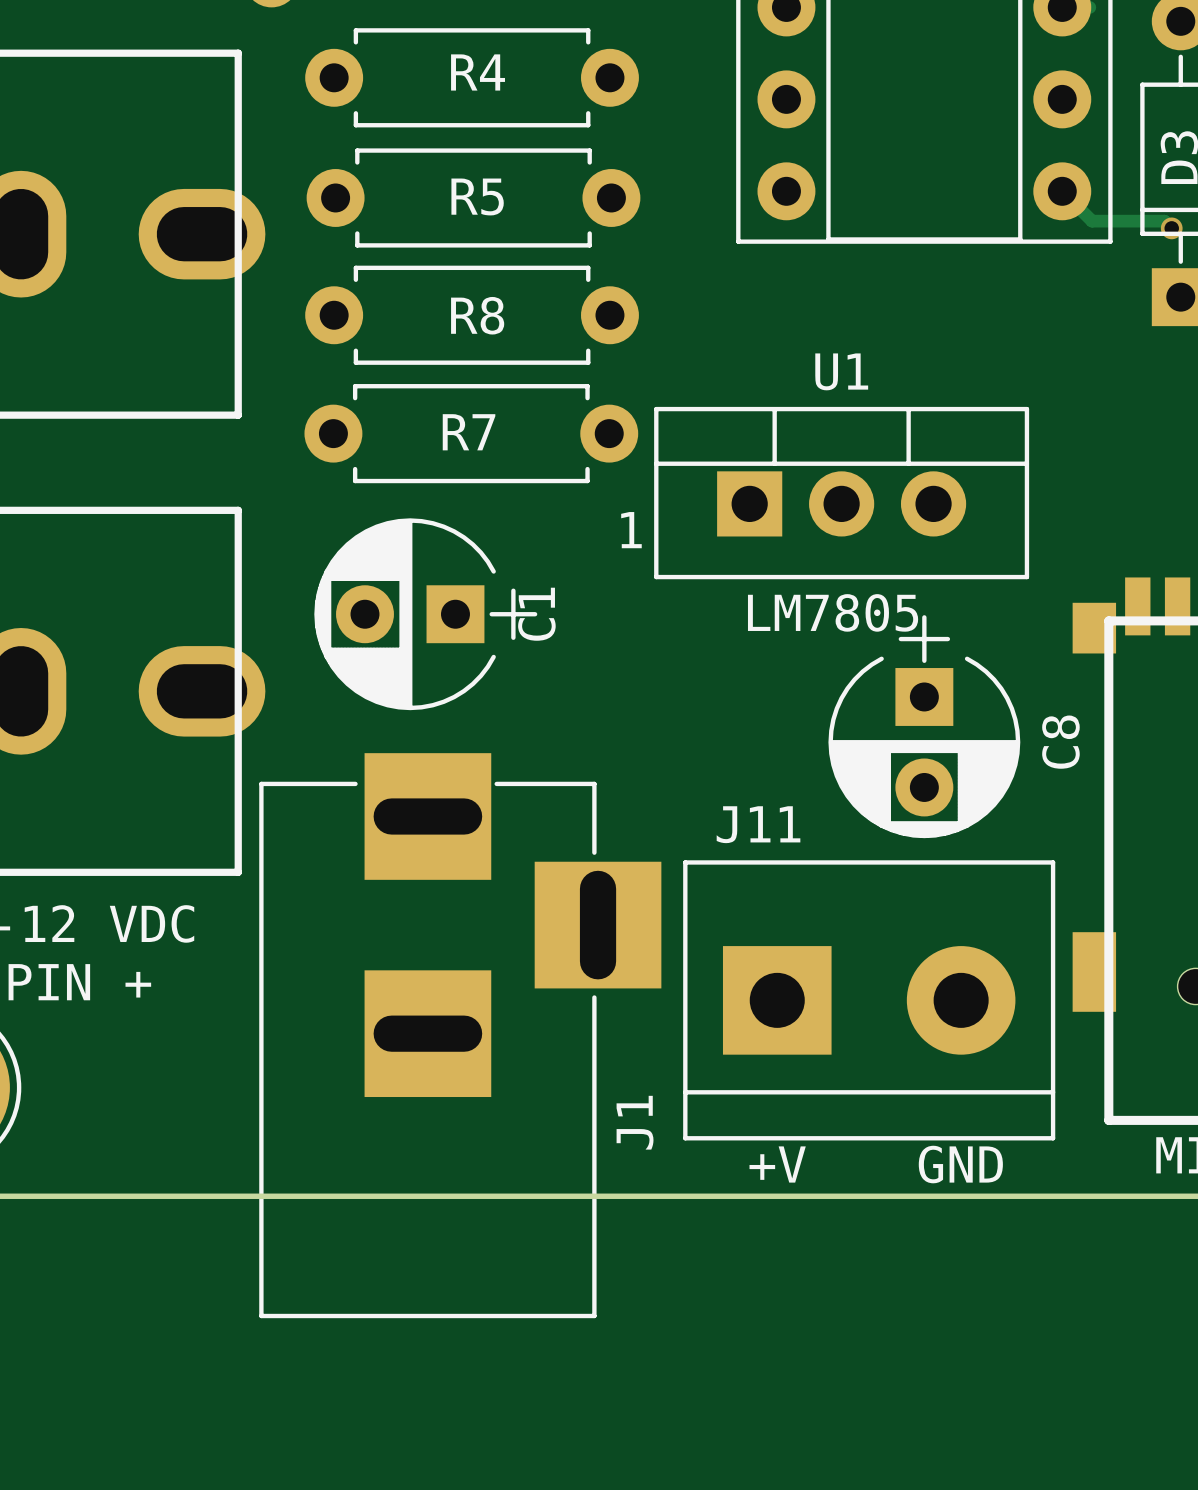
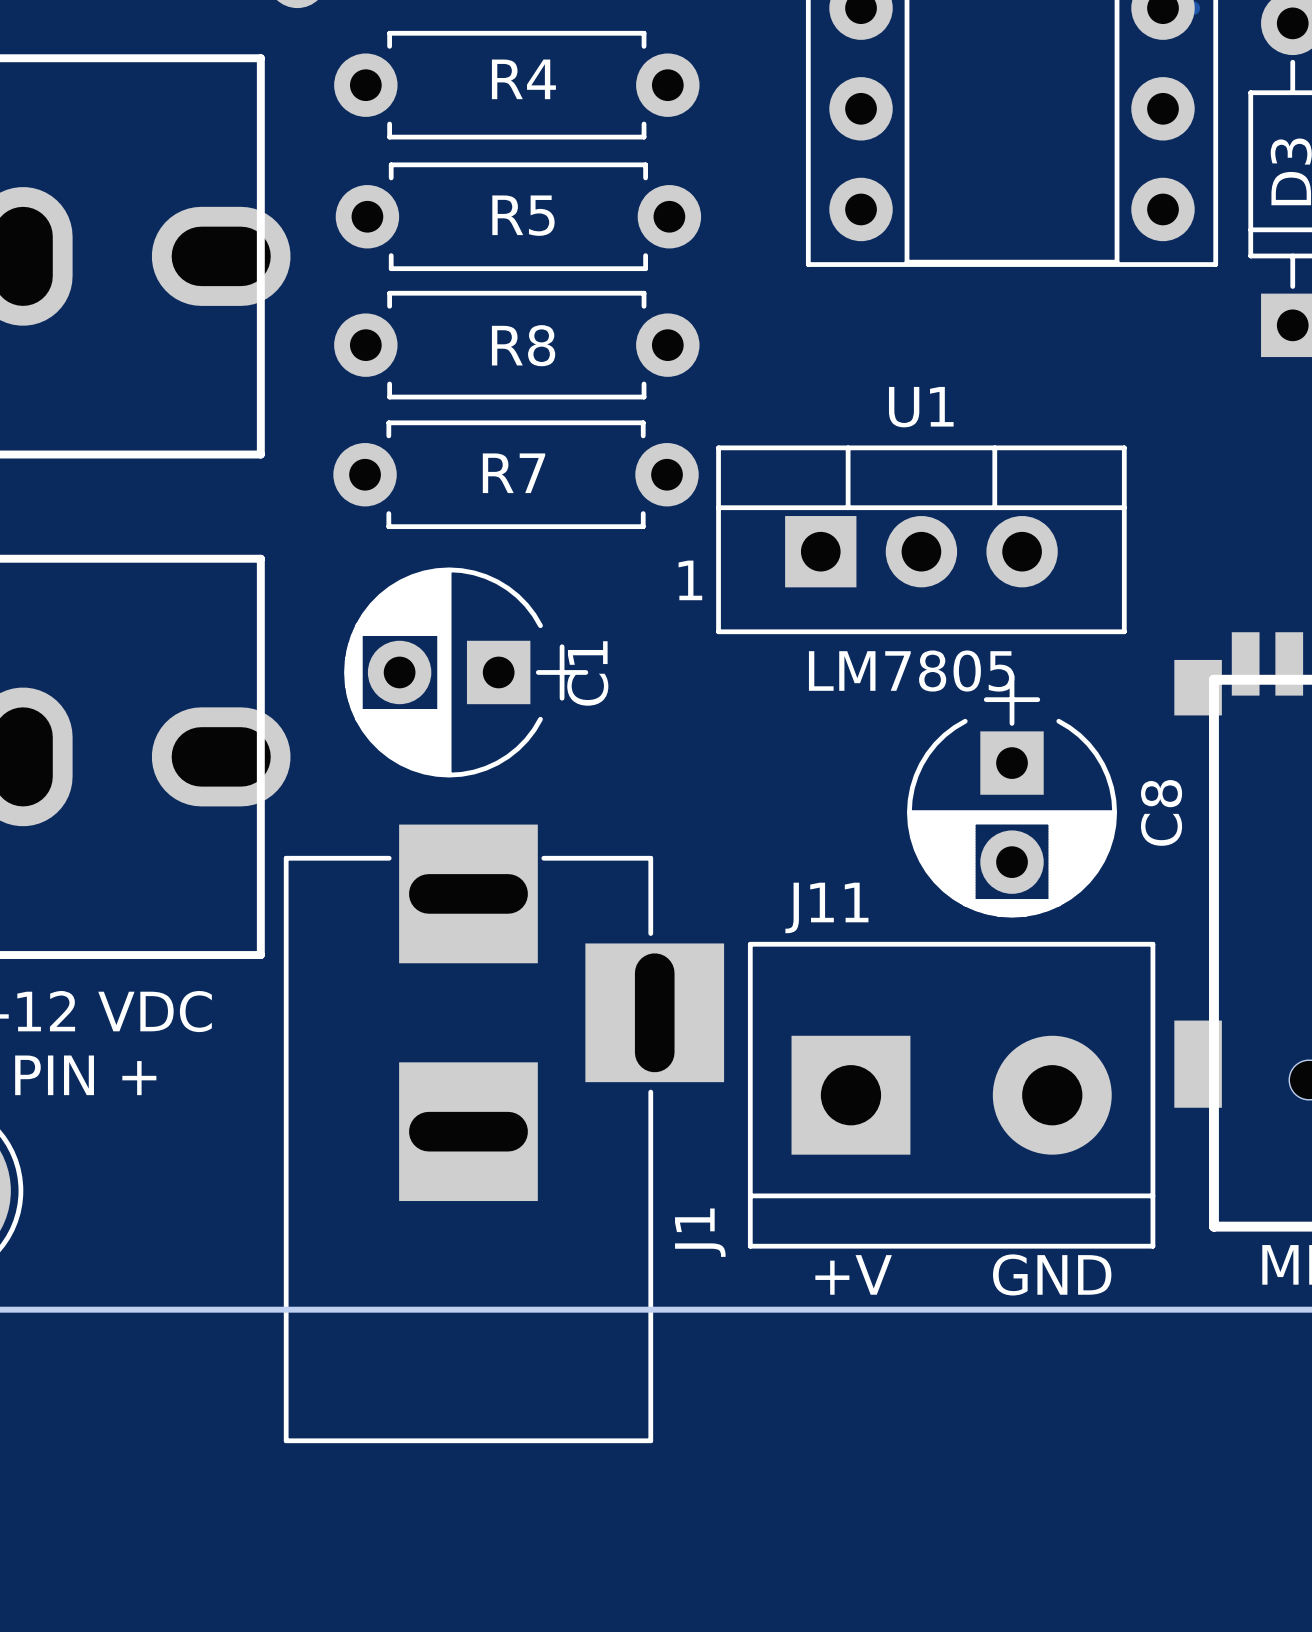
track: (1062, 191) (1092, 221) (1164, 221) (1171, 228) -> none
via: (1171, 228) -> none

